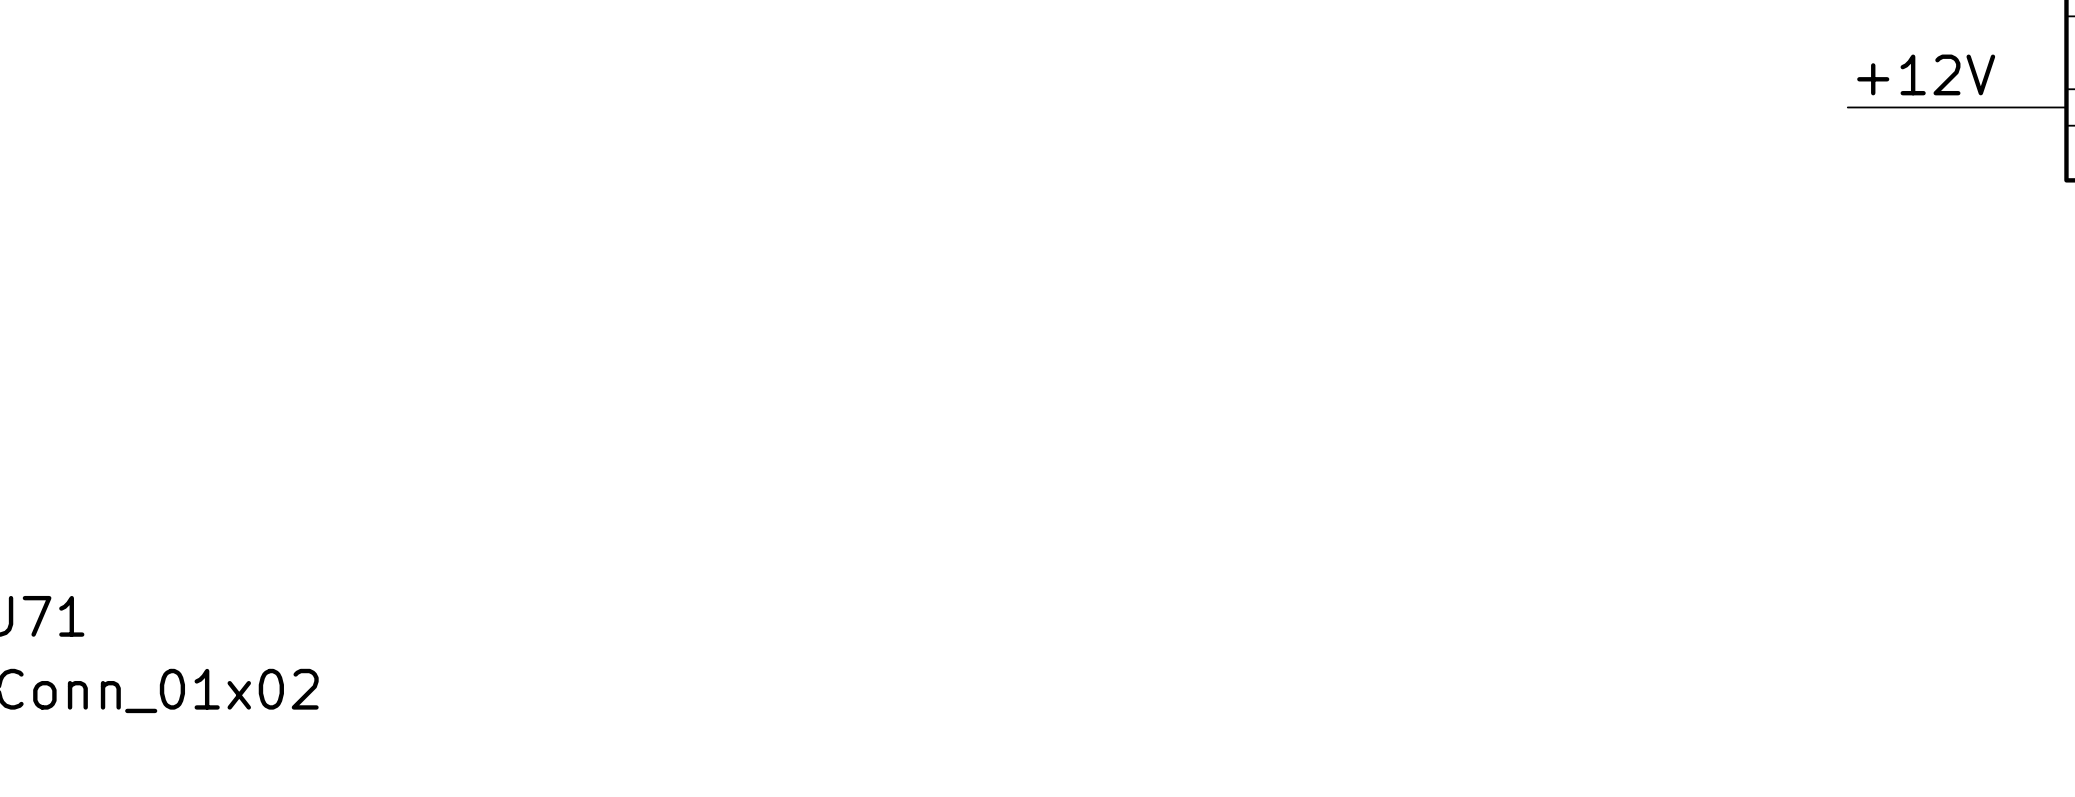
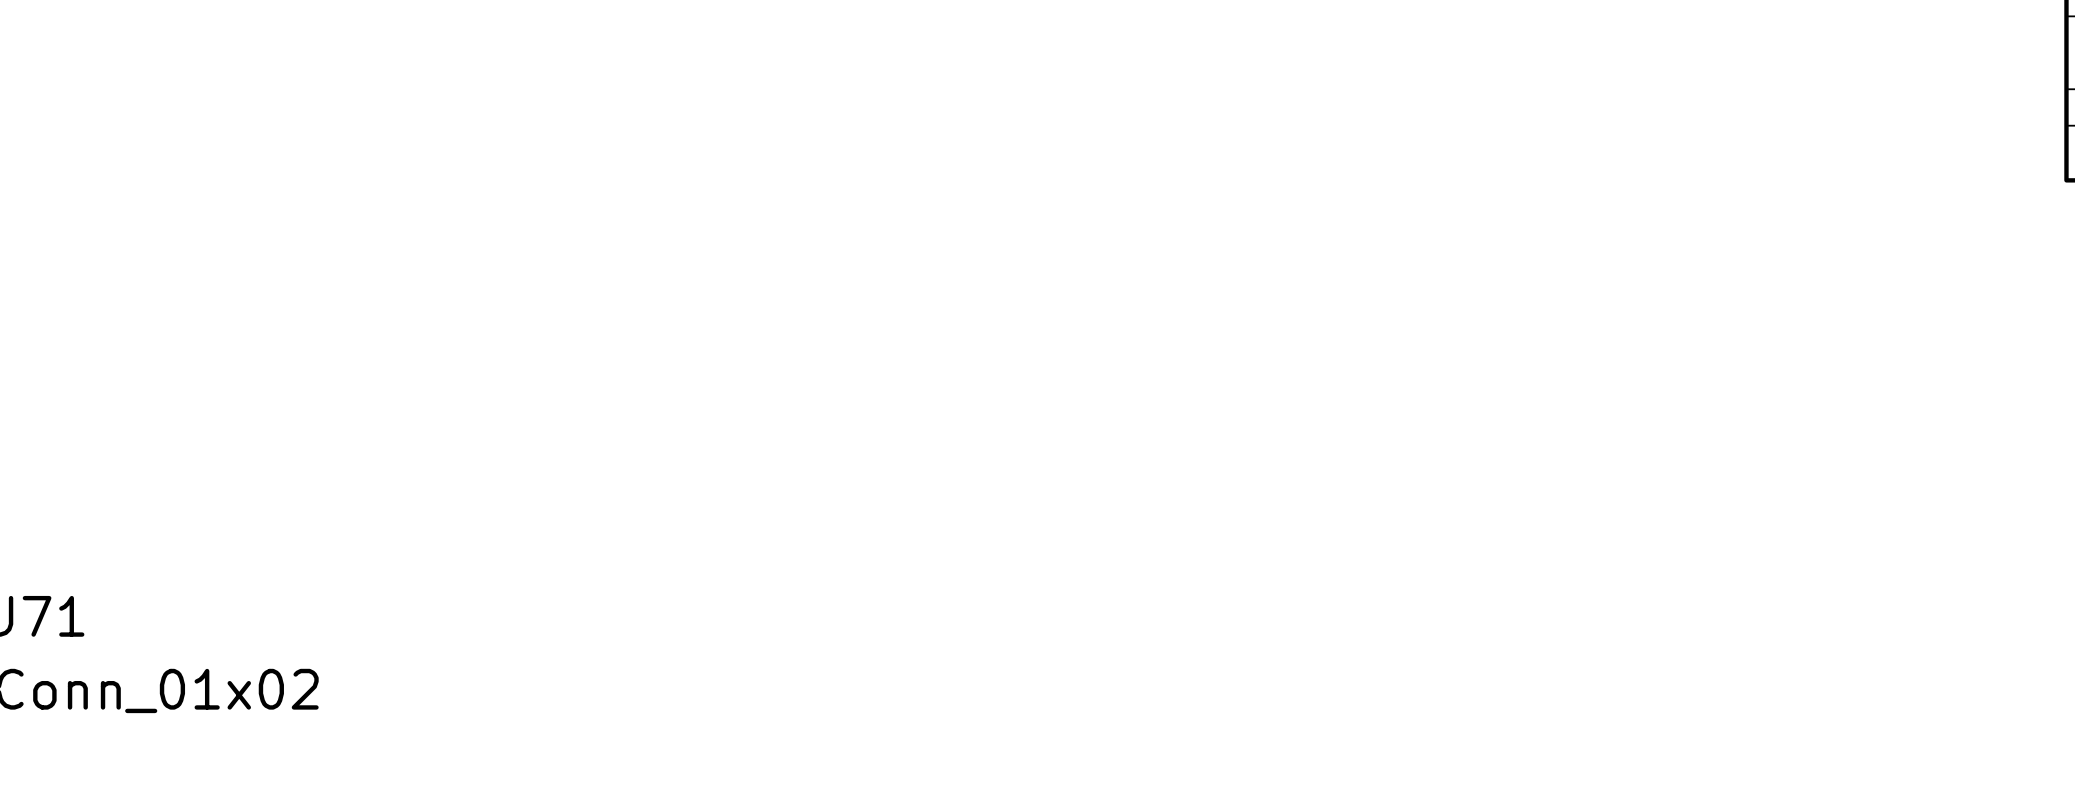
label: +12V (1926, 74) -> none
wire: (1847, 107) (2066, 107) -> none

